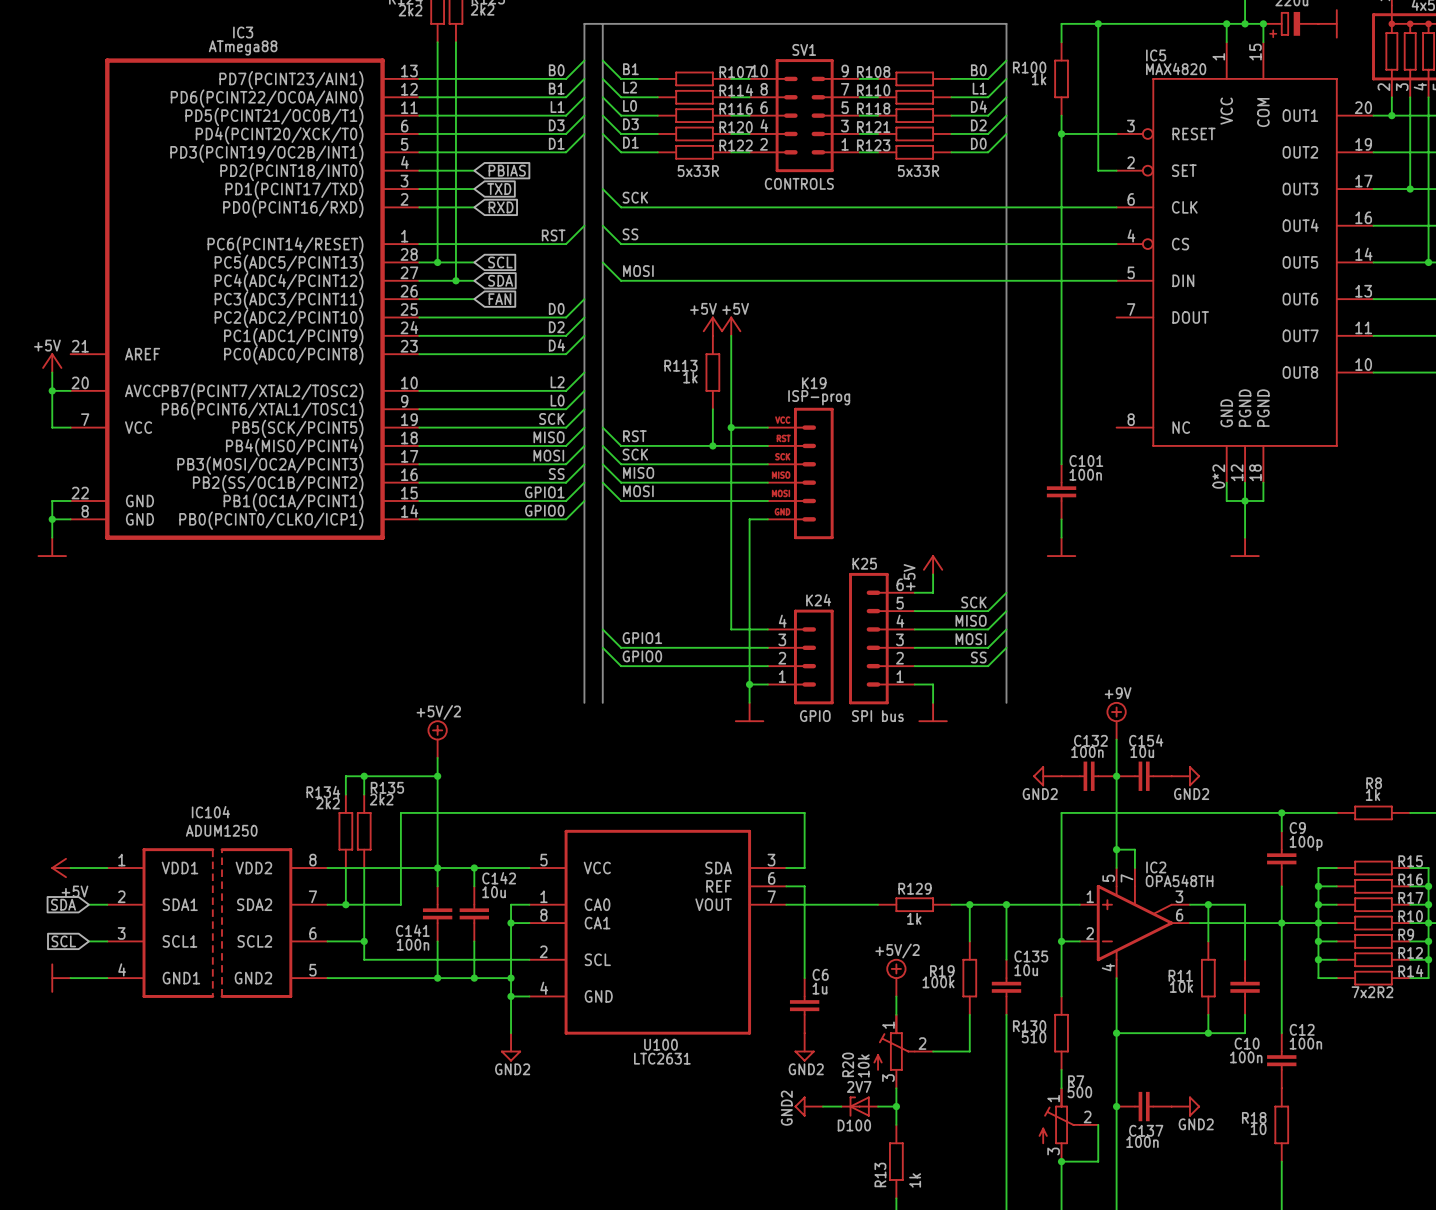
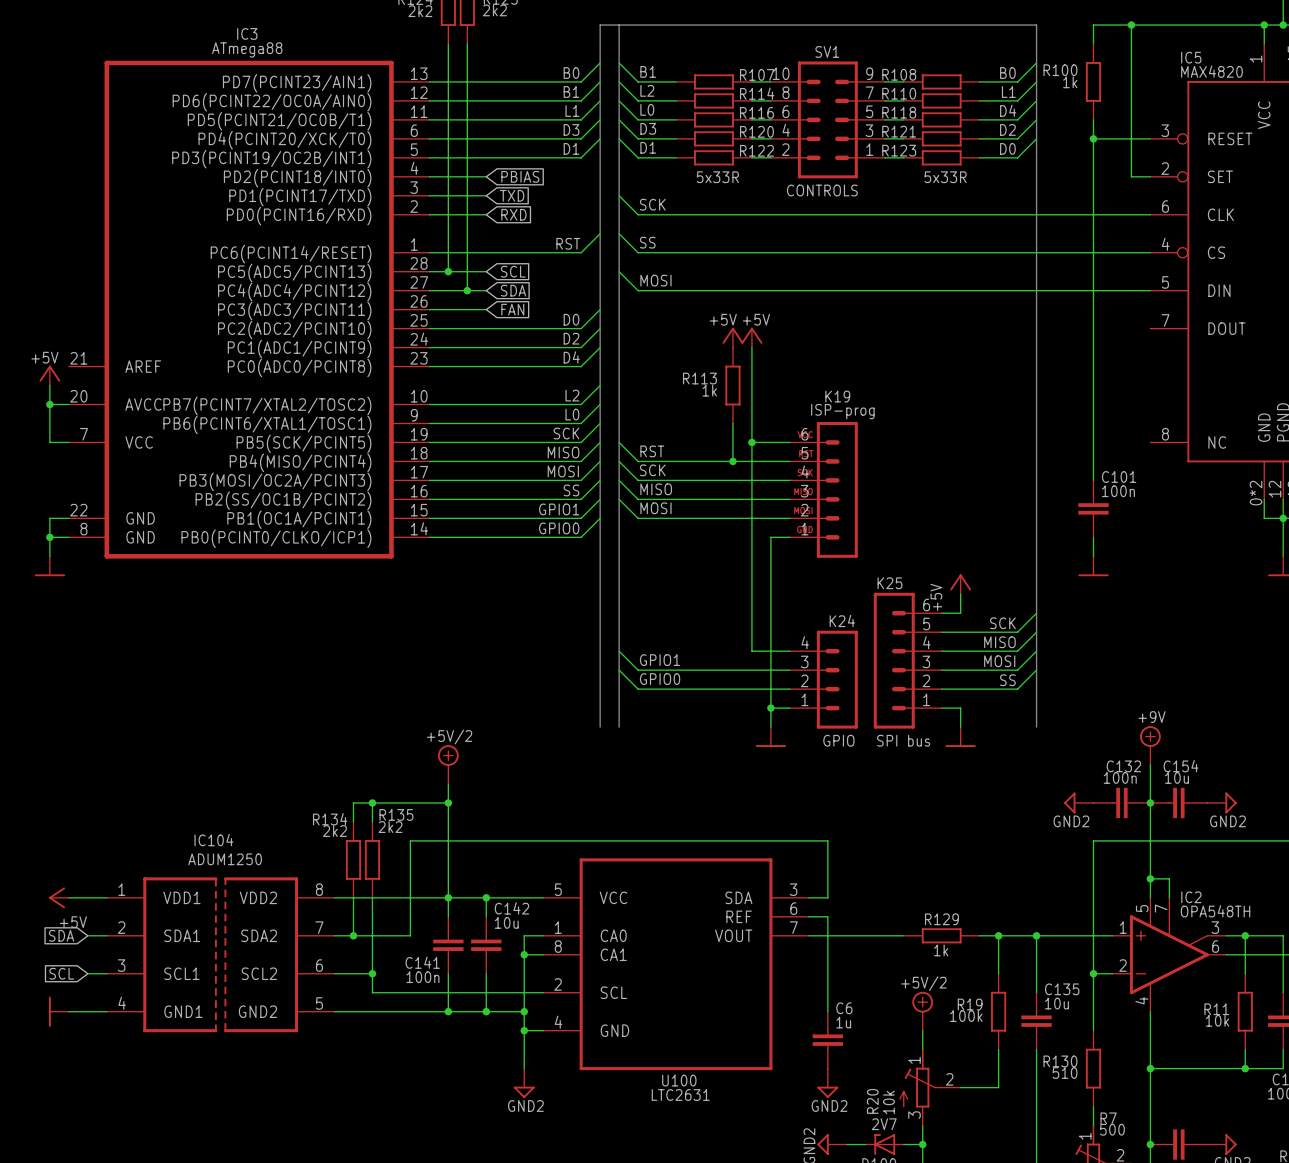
K19 pin number: none -> 6 (804, 434)
K19 pin number: none -> 5 (804, 453)
K19 pin number: none -> 4 (805, 471)
K19 pin number: none -> 3 (804, 491)
K19 pin number: none -> 2 (804, 510)
K19 pin number: none -> 1 (804, 529)

